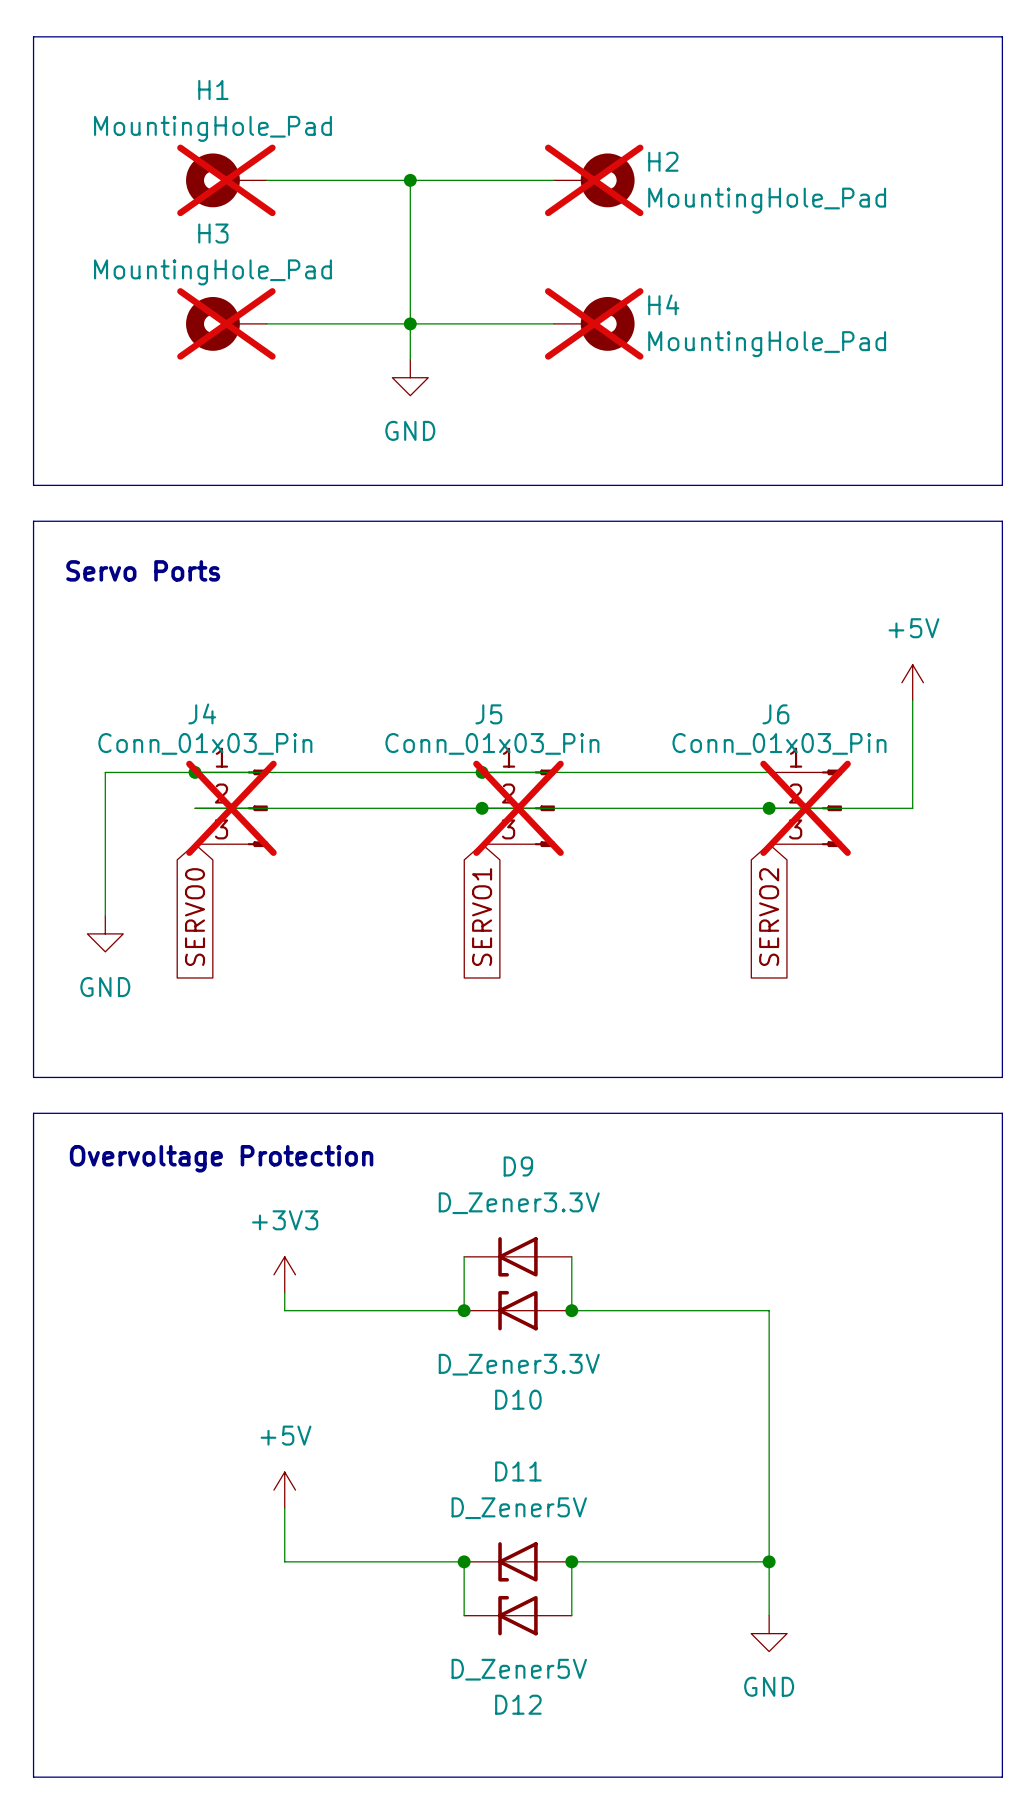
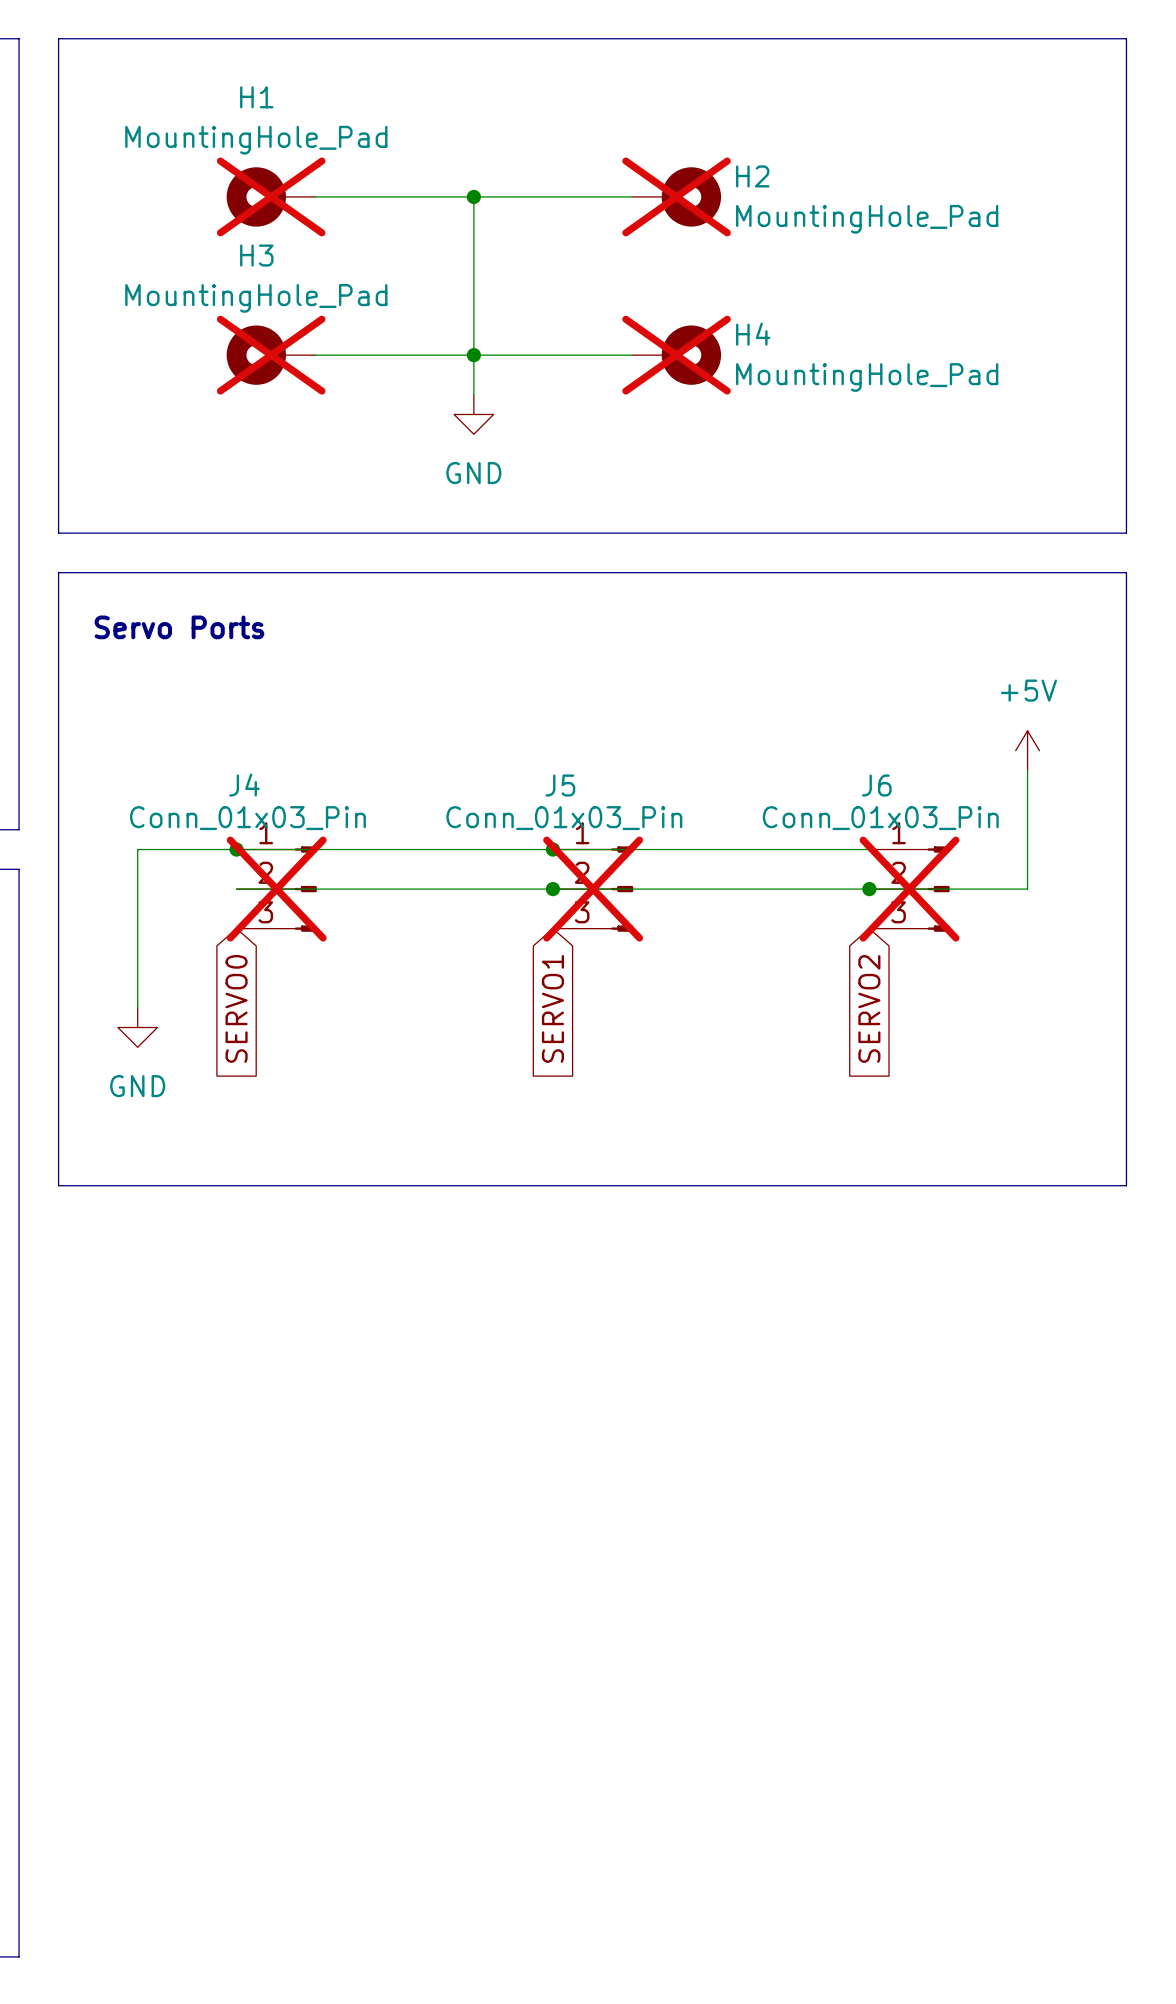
line: (33, 1113) (1002, 1113) (1002, 1777) (33, 1777) (33, 1113) -> none
text: Overvoltage Protection (221, 1158) -> none
wire: (464, 1256) (464, 1310) (284, 1310) (284, 1292) -> none
D9: D_Zener3.3V (517, 1256) -> none
wire: (571, 1256) (571, 1310) (769, 1310) (769, 1615) -> none
power symbol: +3V3 (284, 1274) -> none
junction: (464, 1310) -> none
D10: D_Zener3.3V (517, 1310) -> none
junction: (571, 1310) -> none
power symbol: +5V (284, 1490) -> none
wire: (284, 1508) (284, 1561) (464, 1561) (464, 1615) -> none
junction: (464, 1561) -> none
D11: D_Zener5V (517, 1561) -> none
junction: (571, 1561) -> none
wire: (769, 1561) (571, 1561) (571, 1615) -> none
junction: (769, 1561) -> none
D12: D_Zener5V (517, 1615) -> none
power symbol: GND (769, 1633) -> none

